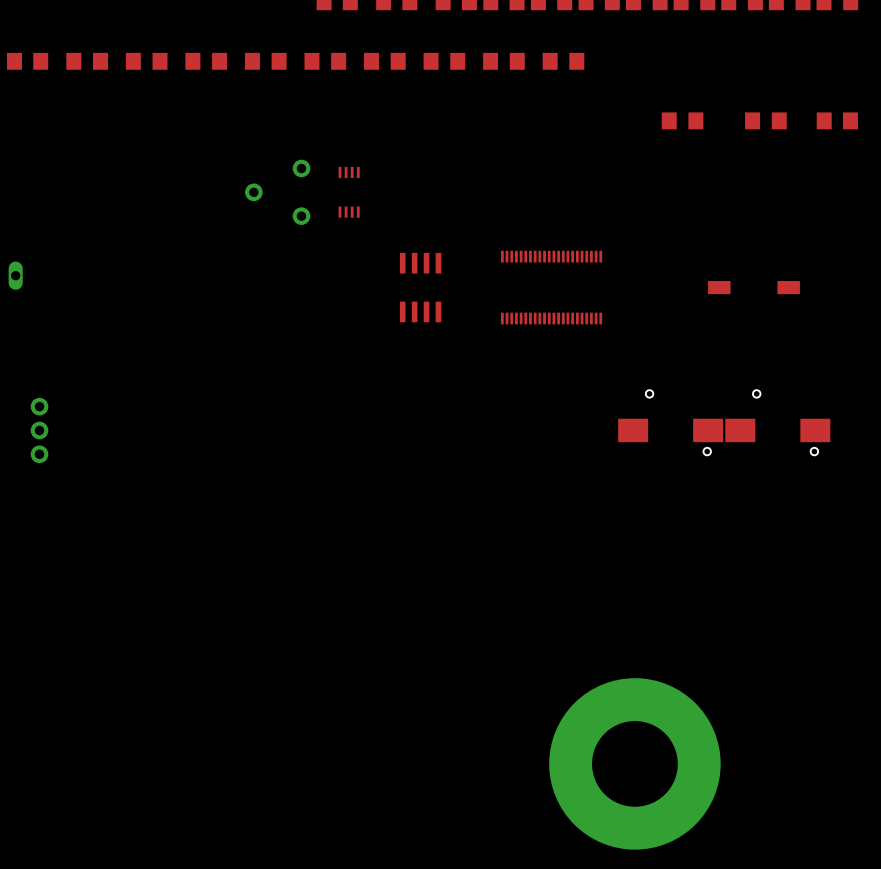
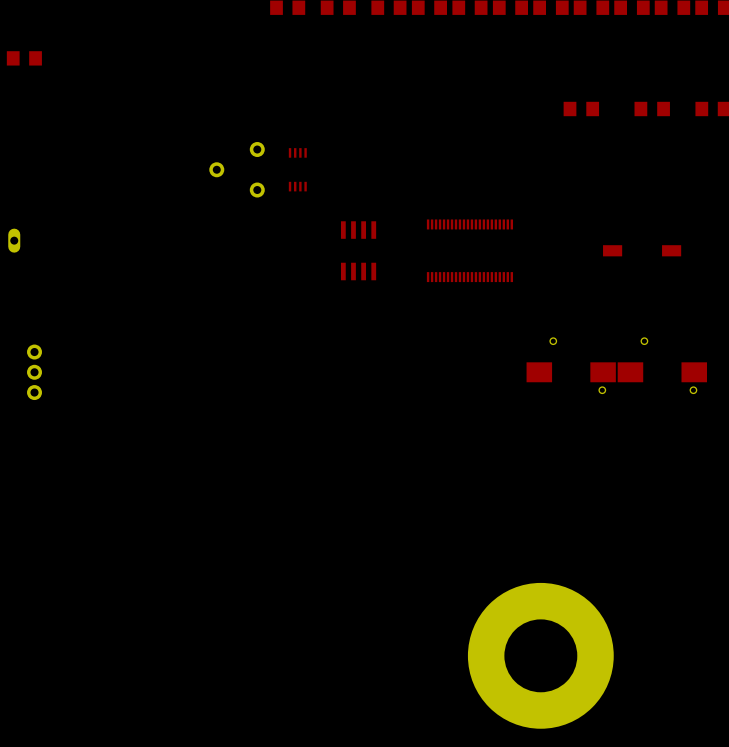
part: (87, 61) -> none
part: (146, 61) -> none
part: (206, 61) -> none
part: (265, 61) -> none
part: (325, 61) -> none
part: (384, 61) -> none
part: (444, 61) -> none
part: (503, 61) -> none
part: (563, 61) -> none

